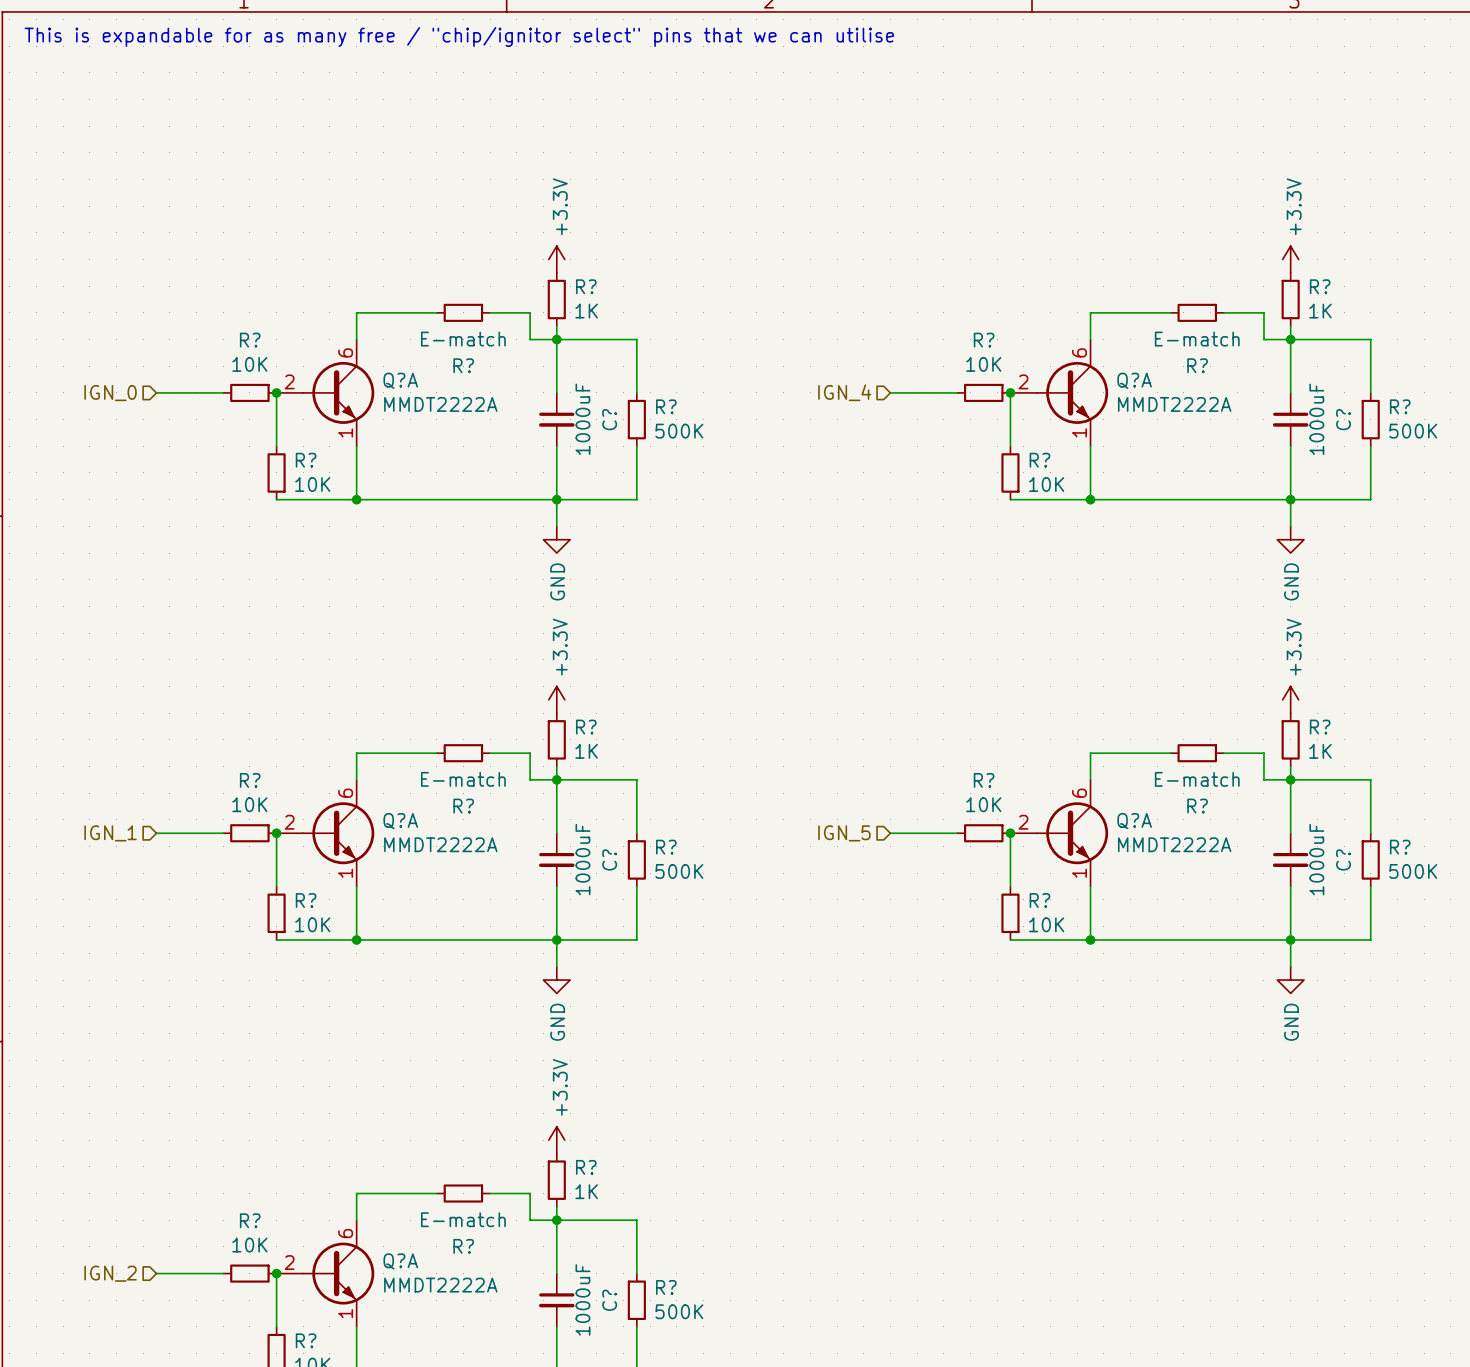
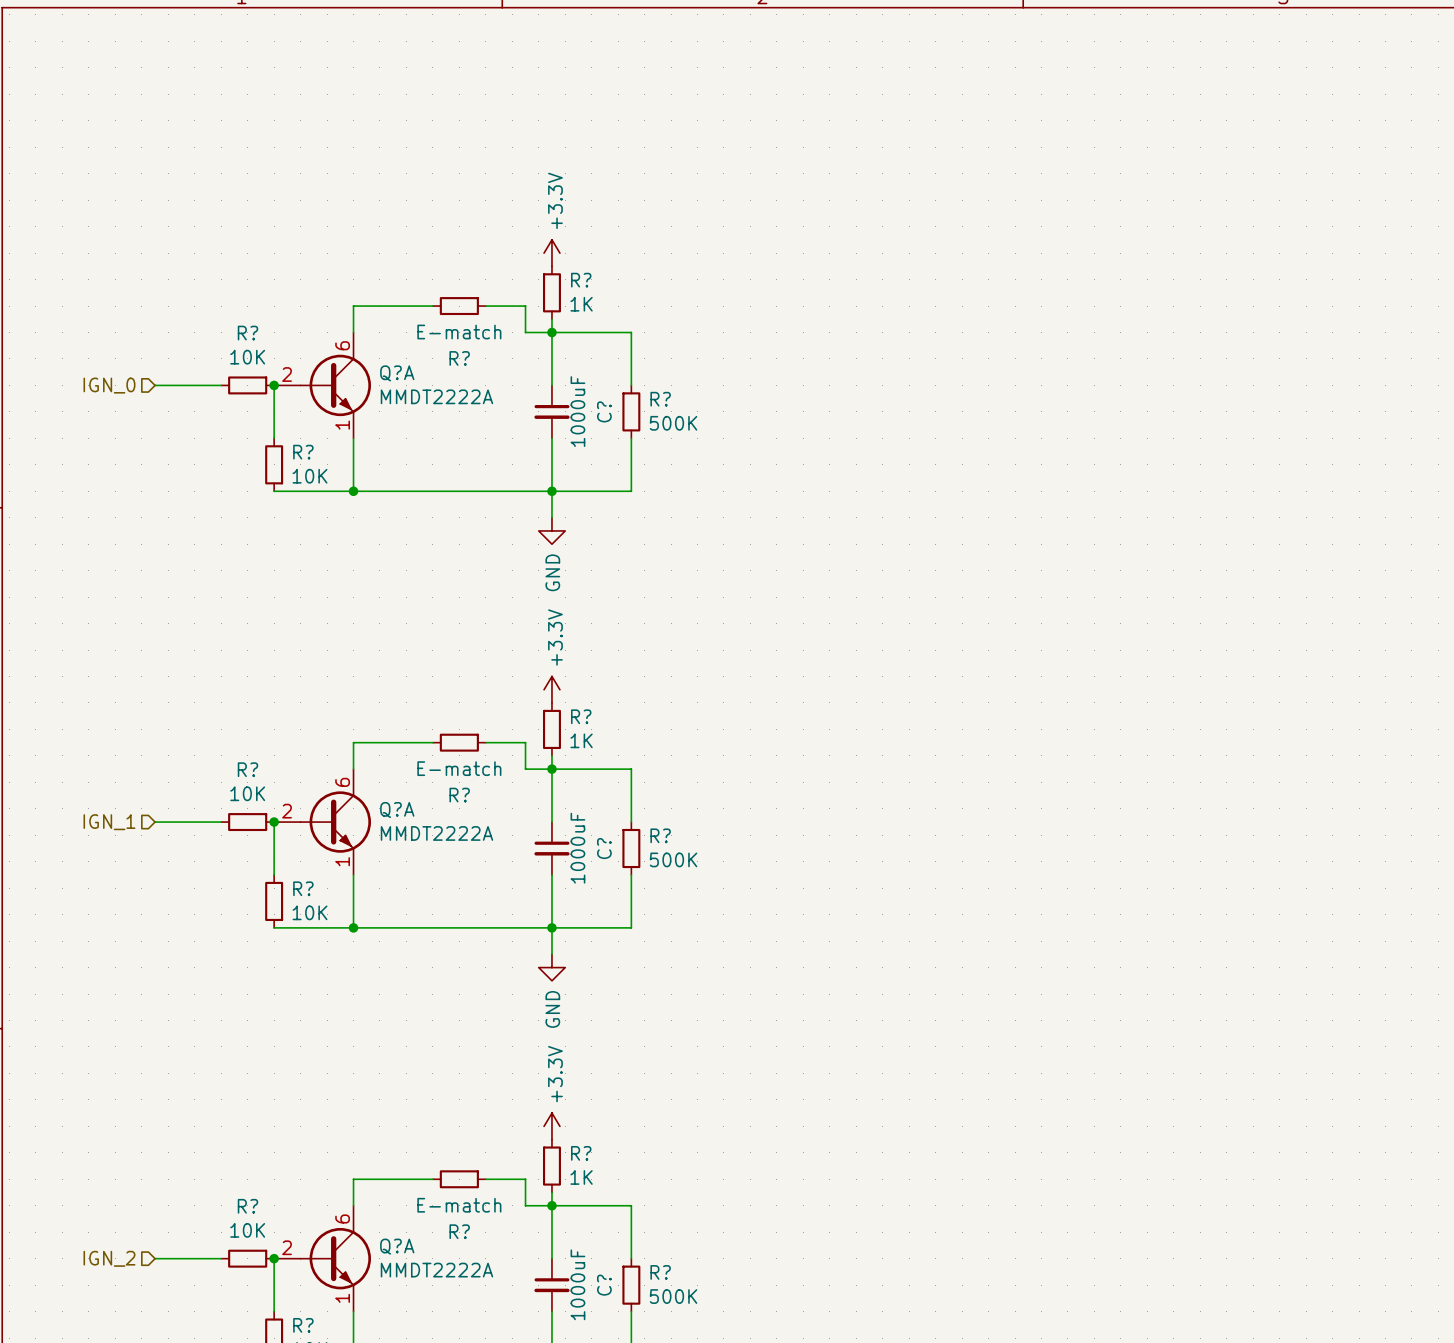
text: This is expandable for as many free / "chip/ignitor select" pins that we can utilise (459, 36) -> none
power symbol: +3.3V (1290, 259) -> none
R?: 1K (1290, 299) -> none
wire: (1170, 312) (1090, 312) (1090, 339) -> none
R?: E-match (1197, 312) -> none
wire: (1223, 312) (1263, 312) (1263, 339) (1370, 339) (1370, 392) -> none
wire: (1290, 326) (1290, 392) -> none
junction: (1290, 339) -> none
hierarchical label: IGN_4 (844, 392) -> none
wire: (890, 392) (957, 392) -> none
R?: 10K (983, 392) -> none
wire: (1010, 392) (1010, 446) -> none
junction: (1010, 392) -> none
Q?A: MMDT2222A (1059, 392) -> none
C?: 1000uF (1290, 419) -> none
R?: 500K (1370, 419) -> none
wire: (1090, 446) (1090, 499) -> none
wire: (1290, 446) (1290, 526) -> none
wire: (1370, 446) (1370, 499) (1010, 499) -> none
R?: 10K (1010, 472) -> none
junction: (1090, 499) -> none
junction: (1290, 499) -> none
power symbol: GND (1290, 539) -> none
power symbol: +3.3V (1290, 699) -> none
R?: 1K (1290, 739) -> none
wire: (1170, 753) (1090, 753) (1090, 779) -> none
R?: E-match (1197, 753) -> none
wire: (1223, 753) (1263, 753) (1263, 779) (1370, 779) (1370, 833) -> none
wire: (1290, 766) (1290, 833) -> none
junction: (1290, 779) -> none
hierarchical label: IGN_5 (844, 833) -> none
wire: (890, 833) (957, 833) -> none
R?: 10K (983, 833) -> none
wire: (1010, 833) (1010, 886) -> none
junction: (1010, 833) -> none
Q?A: MMDT2222A (1059, 833) -> none
C?: 1000uF (1290, 859) -> none
R?: 500K (1370, 859) -> none
wire: (1090, 886) (1090, 940) -> none
wire: (1290, 886) (1290, 966) -> none
wire: (1370, 886) (1370, 940) (1010, 940) -> none
R?: 10K (1010, 913) -> none
junction: (1090, 940) -> none
junction: (1290, 940) -> none
power symbol: GND (1290, 980) -> none

